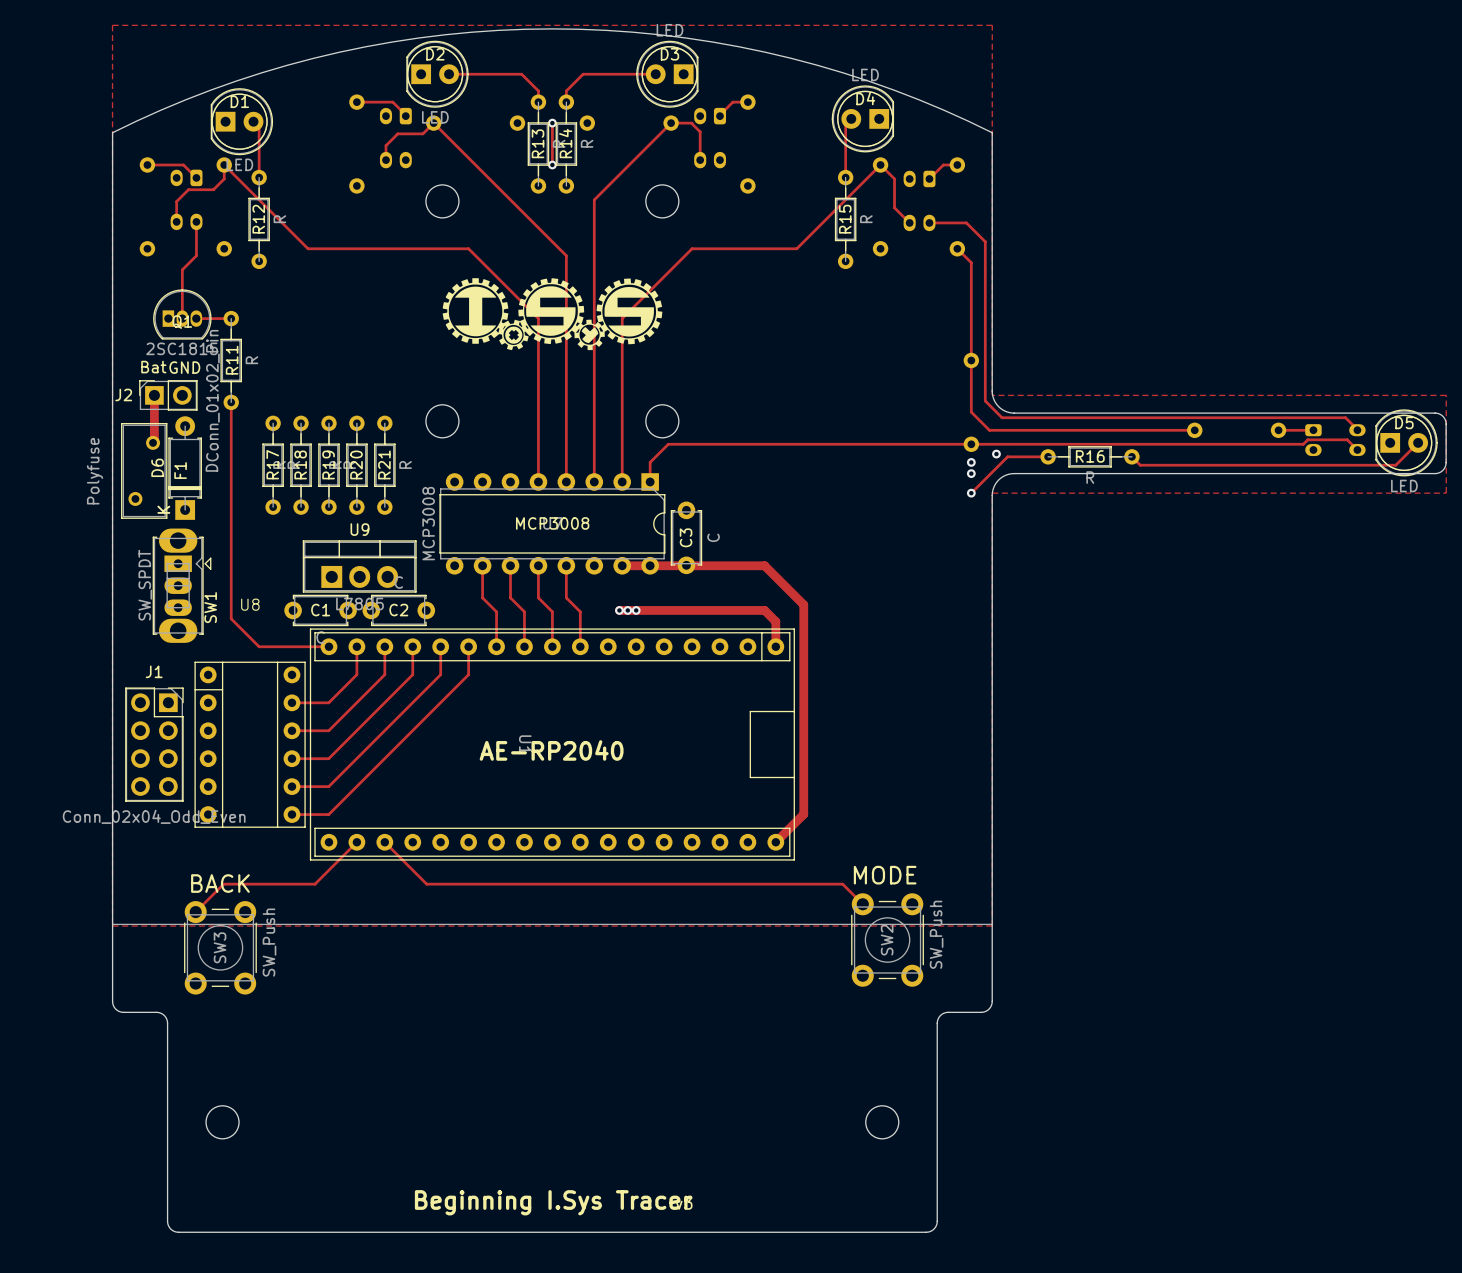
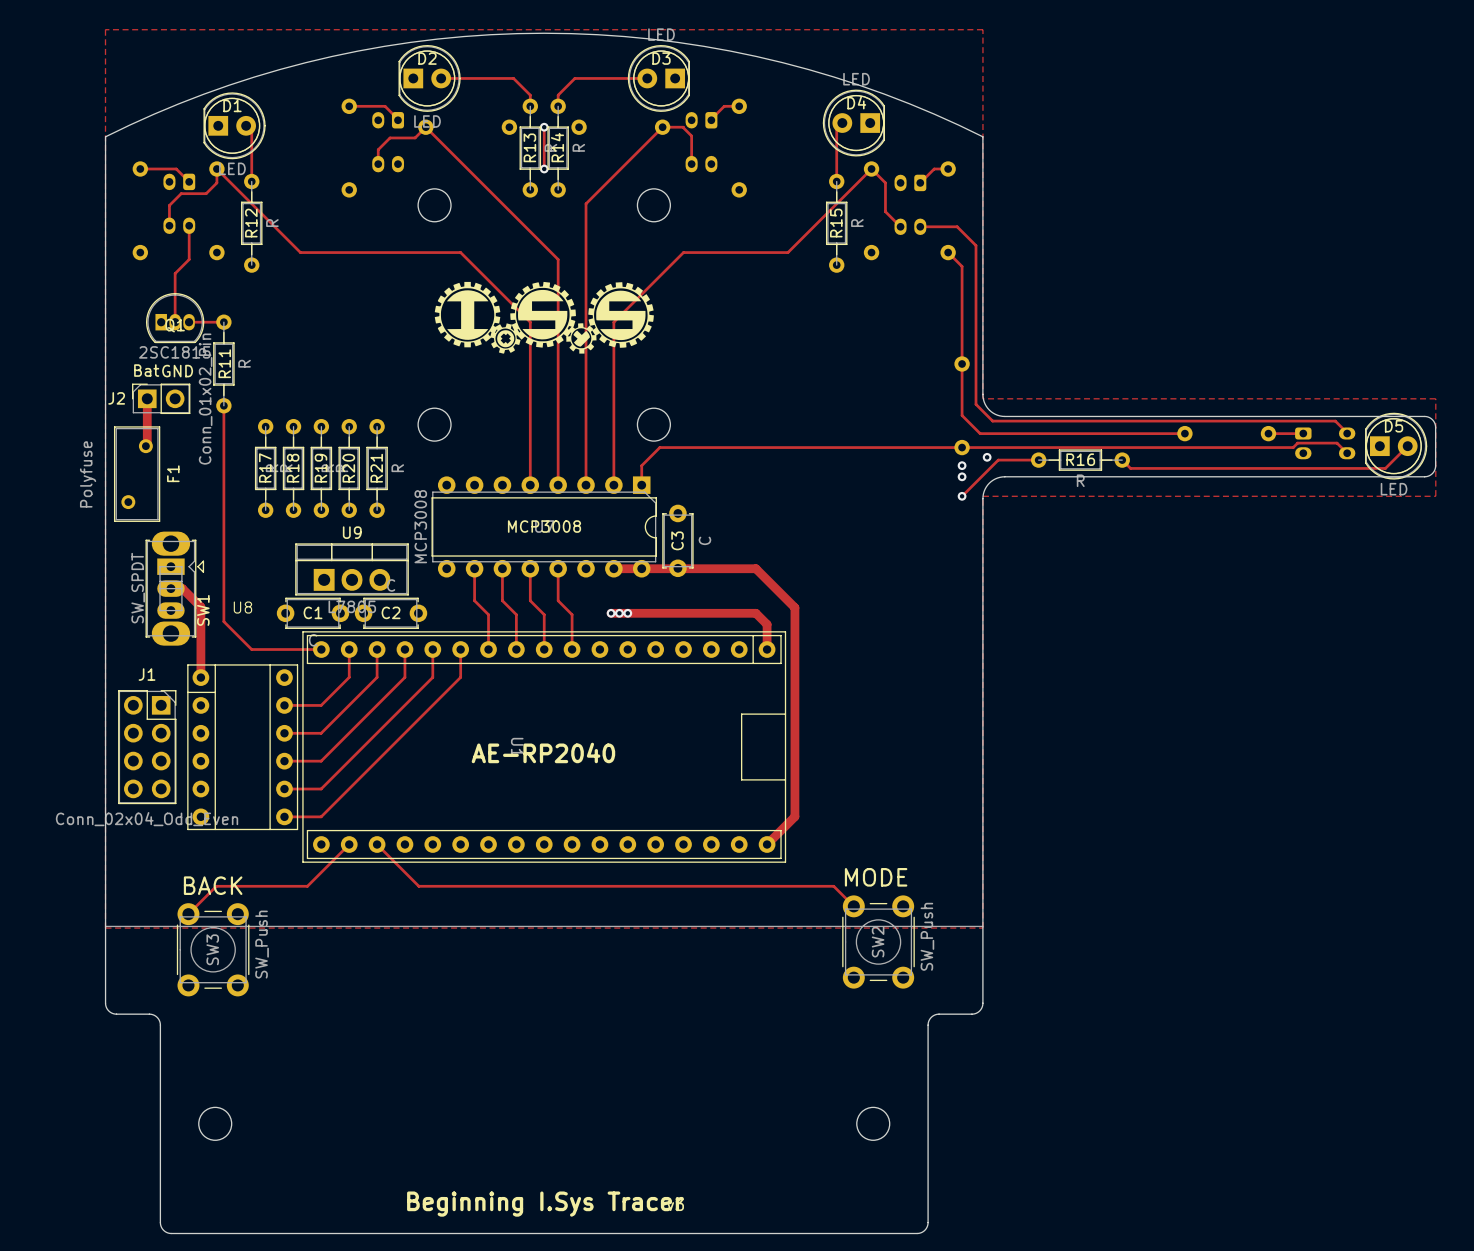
D6: D (185, 468) -> none
track: none -> (170, 588) (182, 588) (200, 607) (200, 677)

